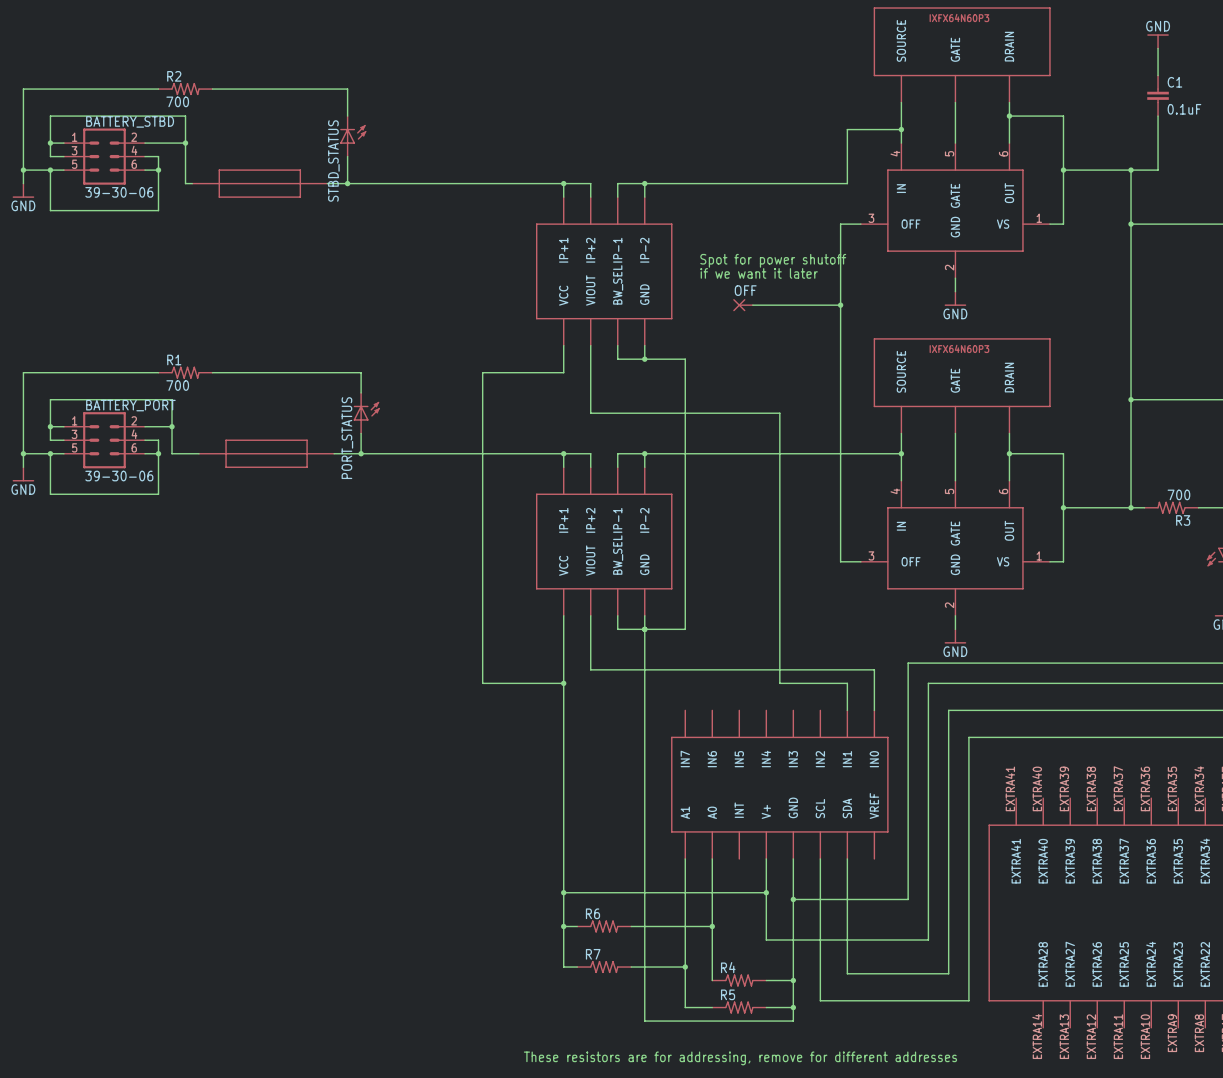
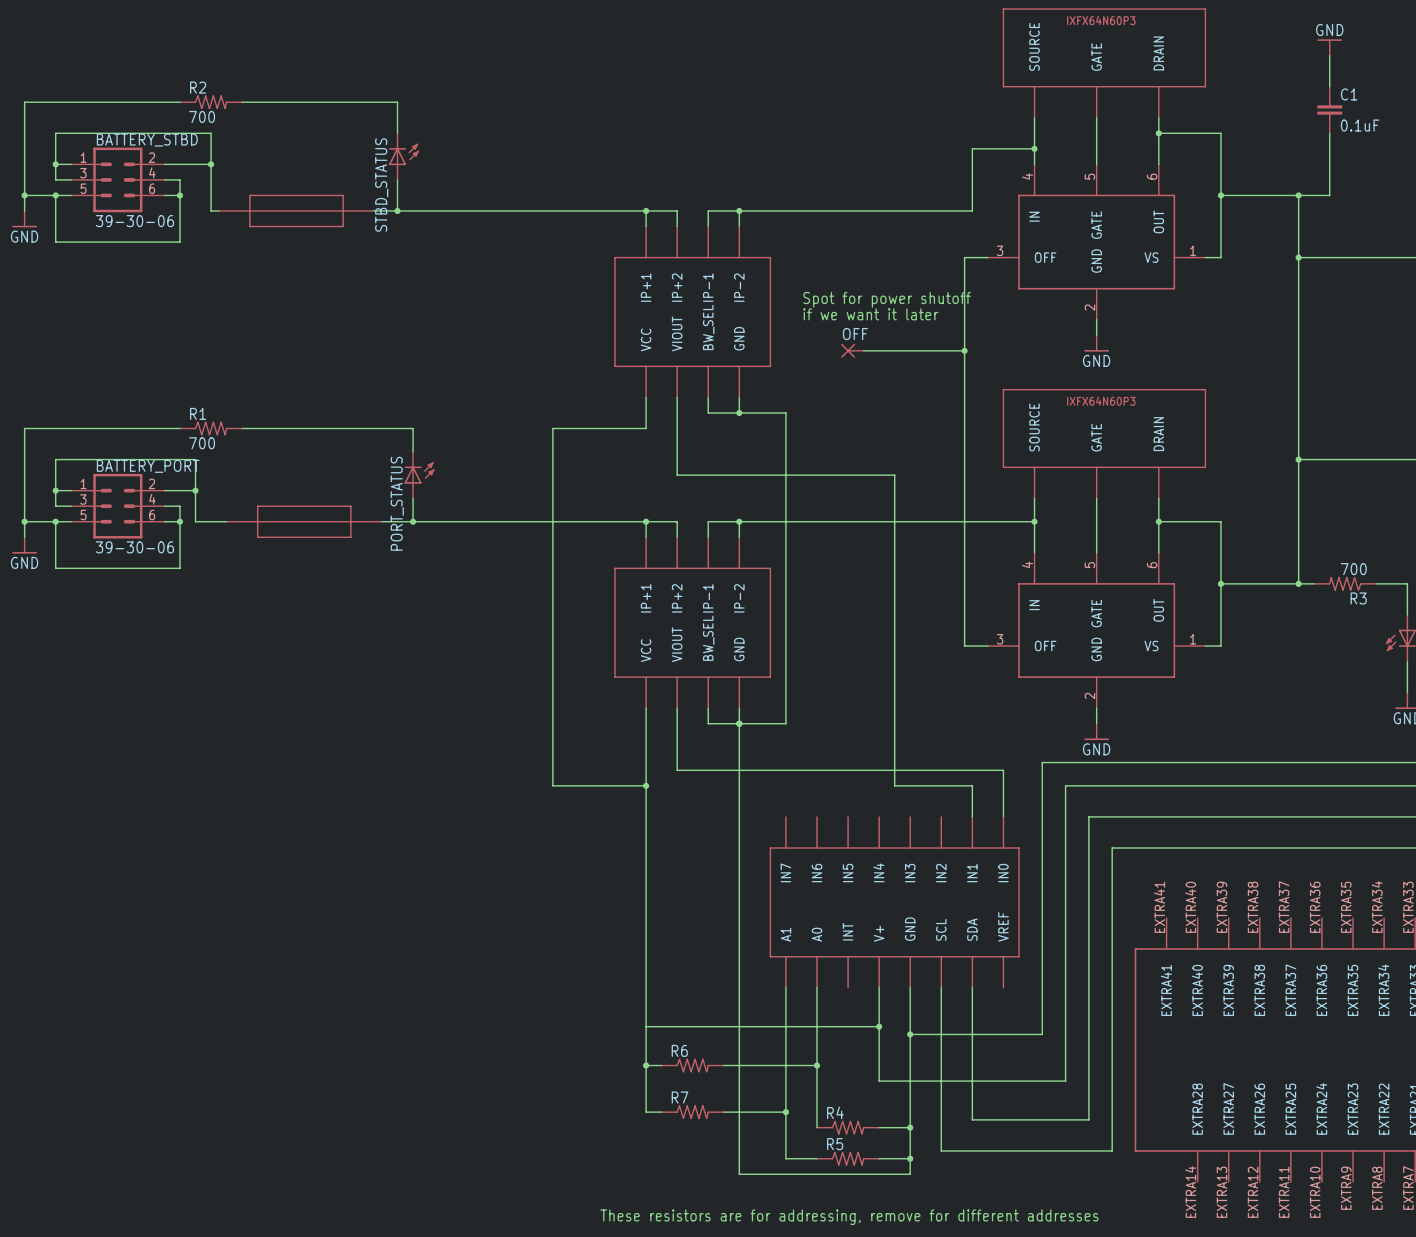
junction: (563, 892) -> none

